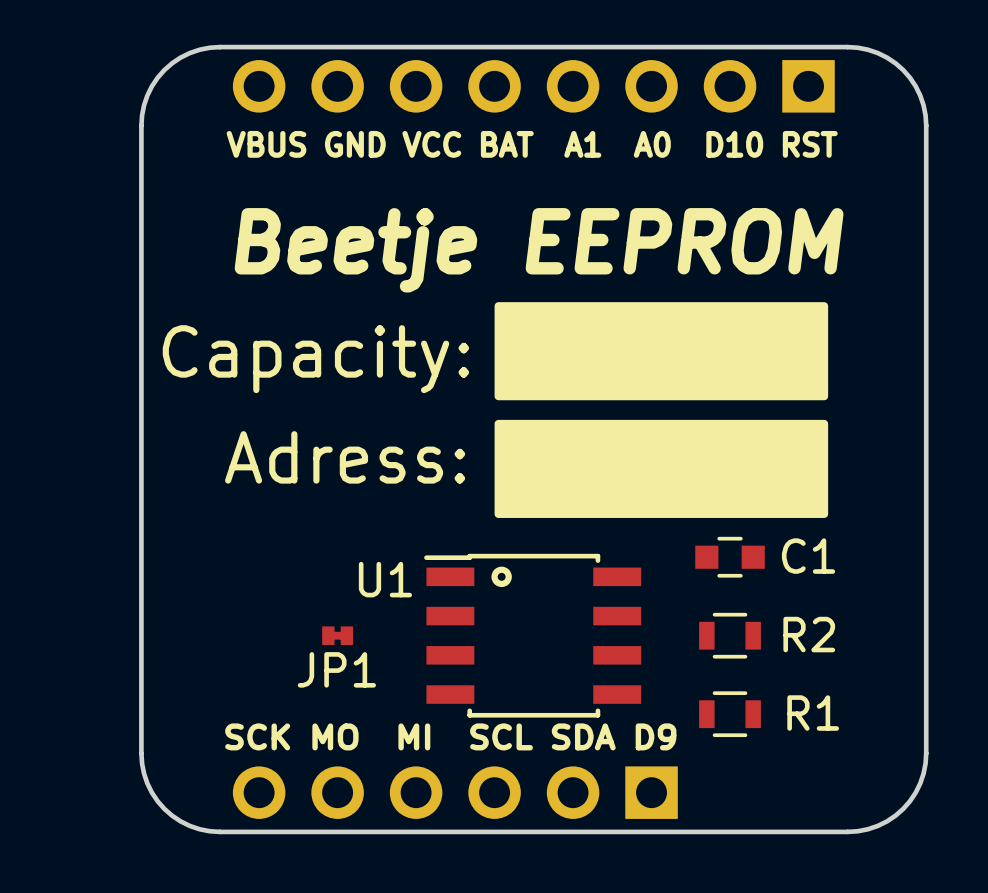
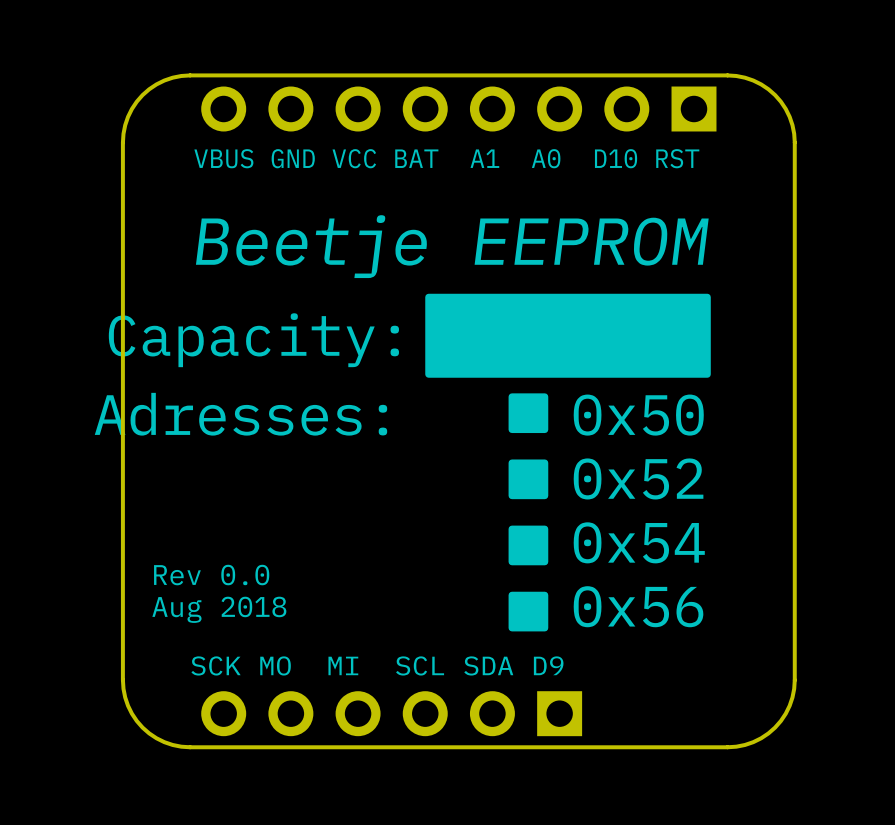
drawing: none -> [508, 393, 549, 632]
drawing: [494, 419, 829, 518] -> none
text: none -> Adresses: 0x50 (399, 414)
text: Adress: (345, 457) -> none
text: none -> 0x52 (638, 478)
C1: (730, 557) -> none
drawing: [491, 566, 512, 588] -> none
text: none -> 0x54 (639, 542)
text: none -> Rev 0.0 (211, 575)
JP1: (337, 635) -> none
U1: (532, 635) -> none
R2: (730, 635) -> none
text: none -> 0x56 (638, 606)
text: none -> Aug 2018 (219, 609)
R1: (730, 714) -> none

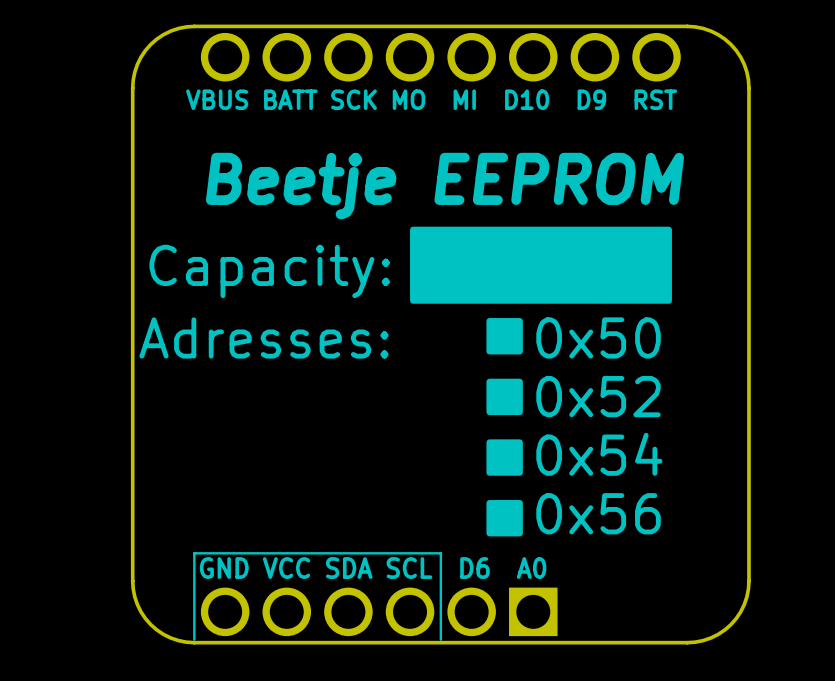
part footprint: [201, 86, 717, 132] -> [200, 32, 681, 82]
text: VBUS GND VCC BAT A1 A0 D10 RST (446, 158) -> none
text: Rev 0.0 (211, 575) -> none
text: Aug 2018 (219, 609) -> none
text: SCK MO MI SCL SDA D9 (377, 665) -> none
part footprint: [201, 691, 583, 737] -> [193, 552, 558, 641]

